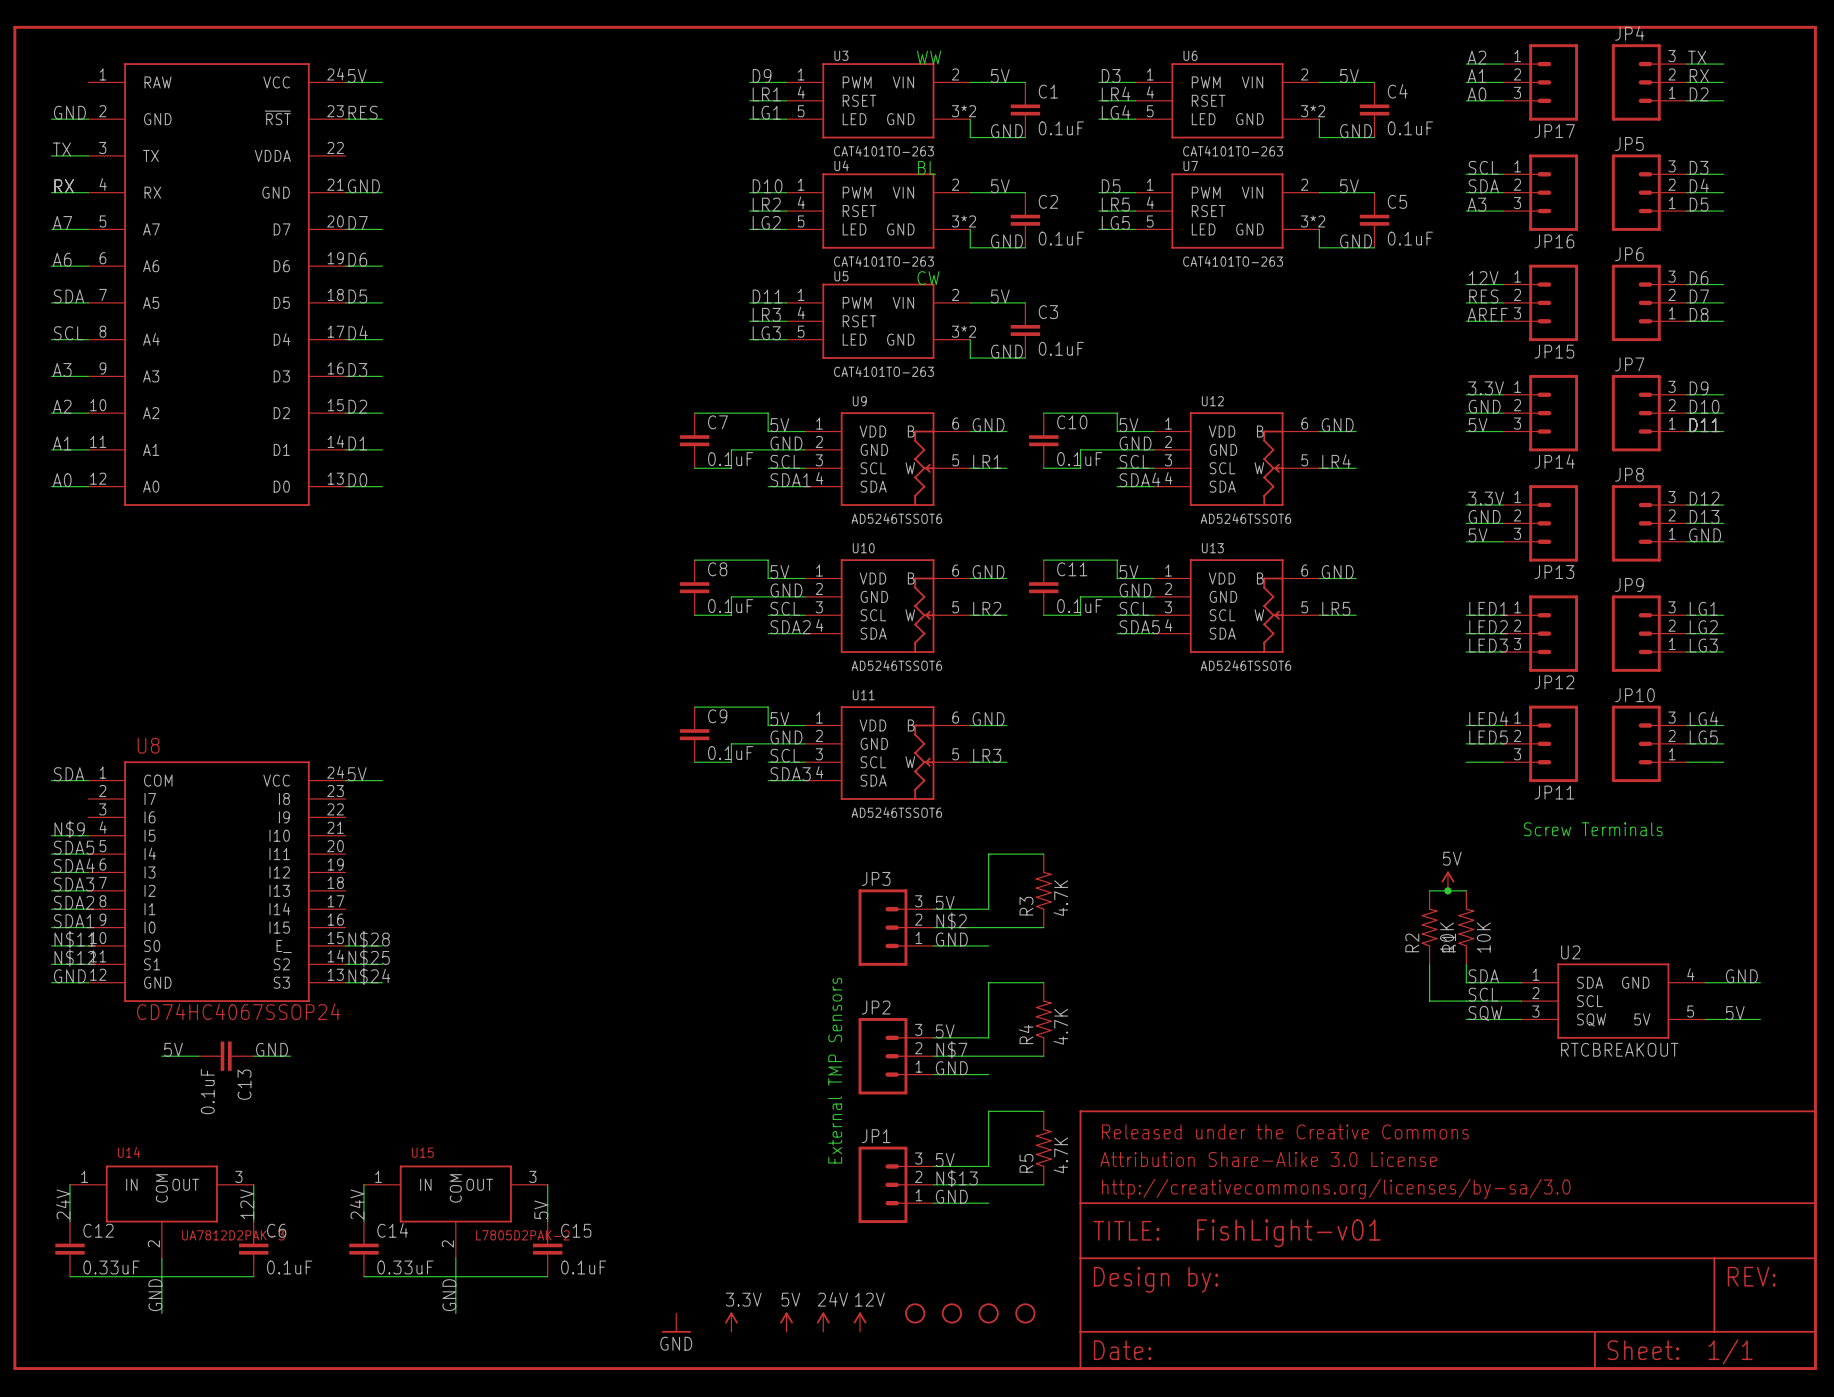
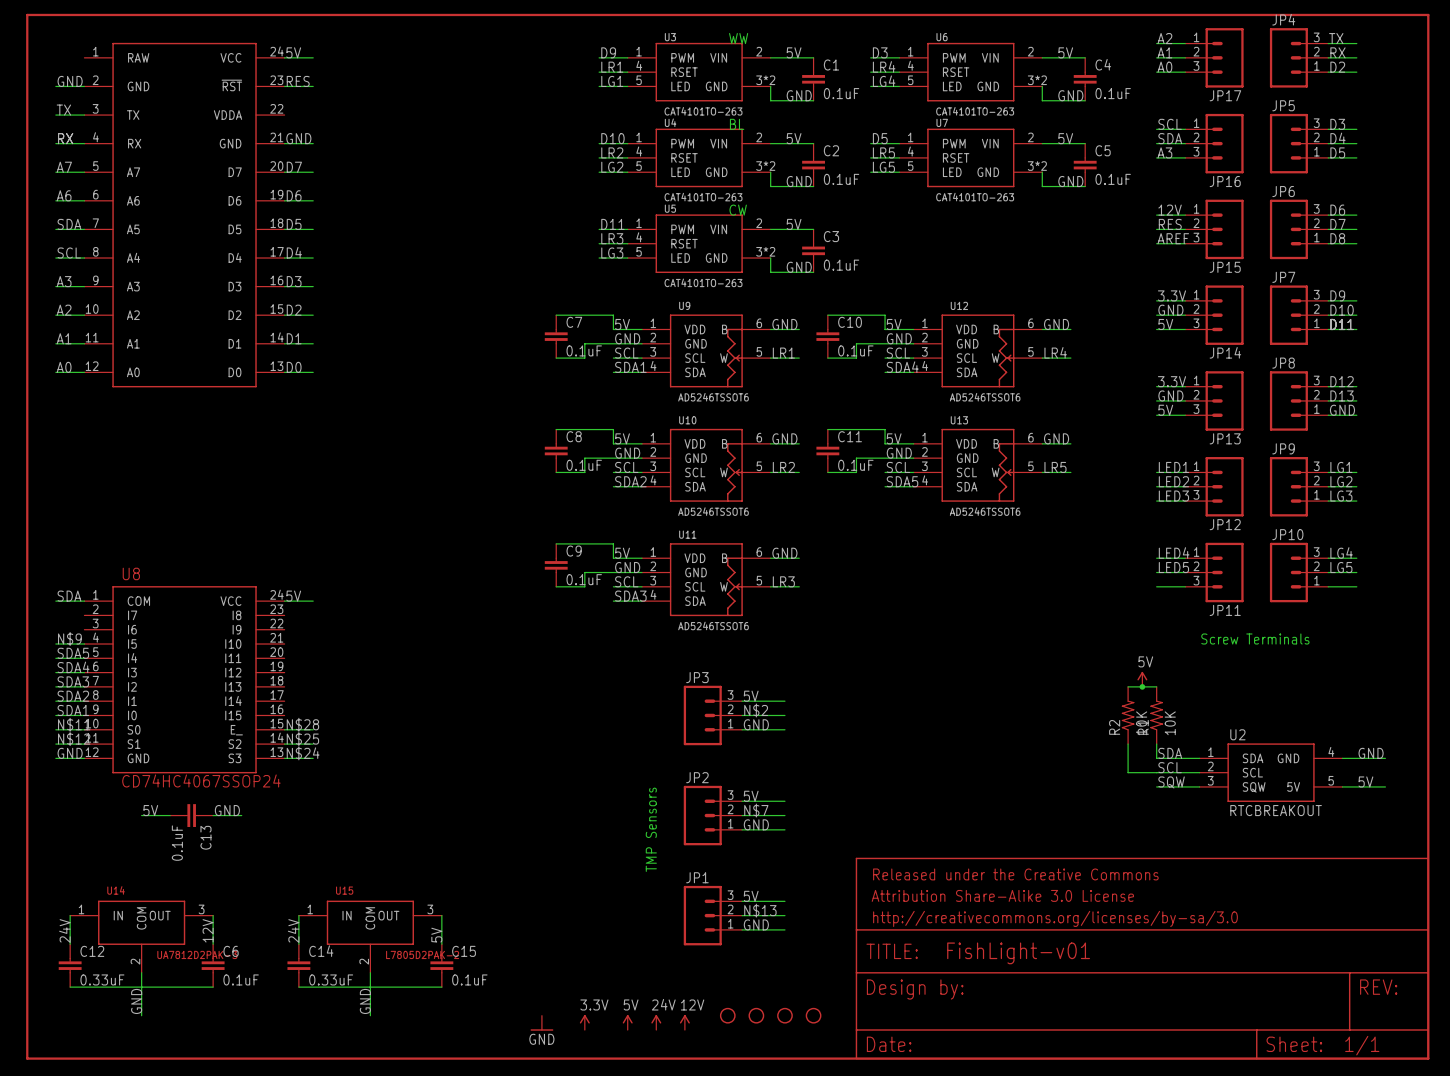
wire: (1043, 854) (988, 854) (988, 909) -> none
R3: 4.7K (1043, 890) -> none
wire: (988, 927) (1043, 927) -> none
wire: (1043, 982) (988, 982) (988, 1037) -> none
R4: 4.7K (1043, 1019) -> none
wire: (988, 1056) (1043, 1056) -> none
text: External TMP Sensors (835, 1070) -> TMP Sensors (651, 829)
wire: (1043, 1111) (988, 1111) (988, 1166) -> none
R5: 4.7K (1043, 1148) -> none
wire: (988, 1184) (1043, 1184) -> none

